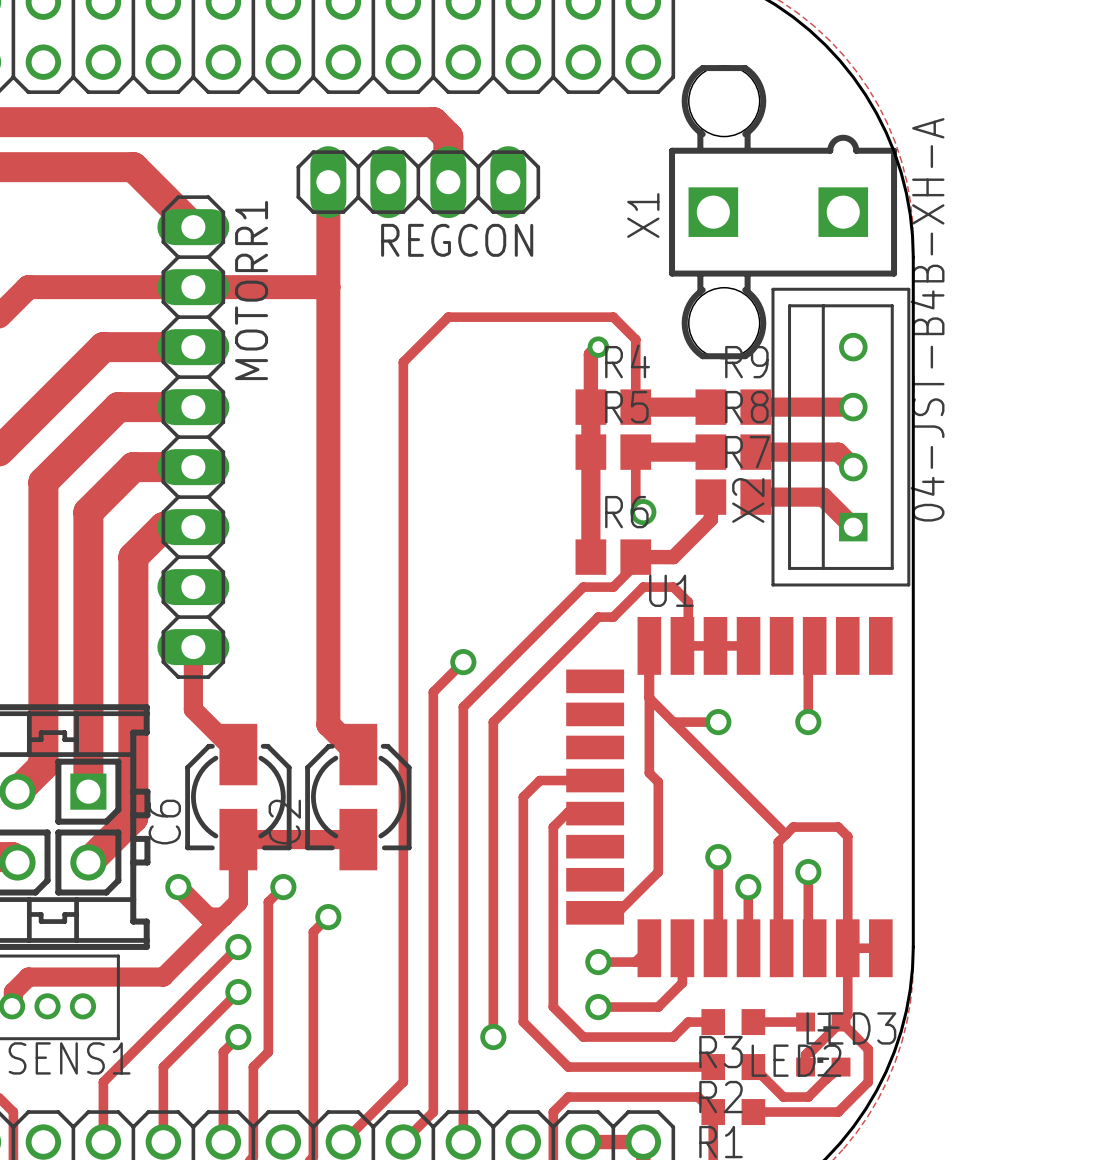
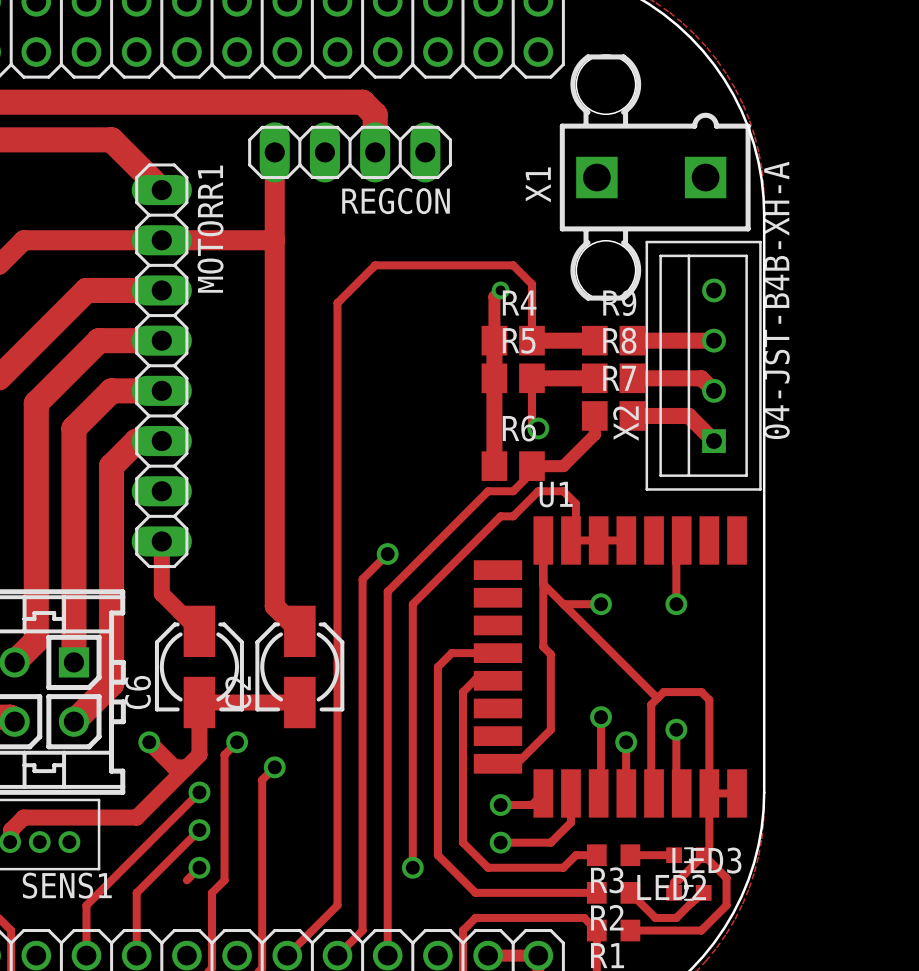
track: (223, 1052) (223, 1142) -> none

